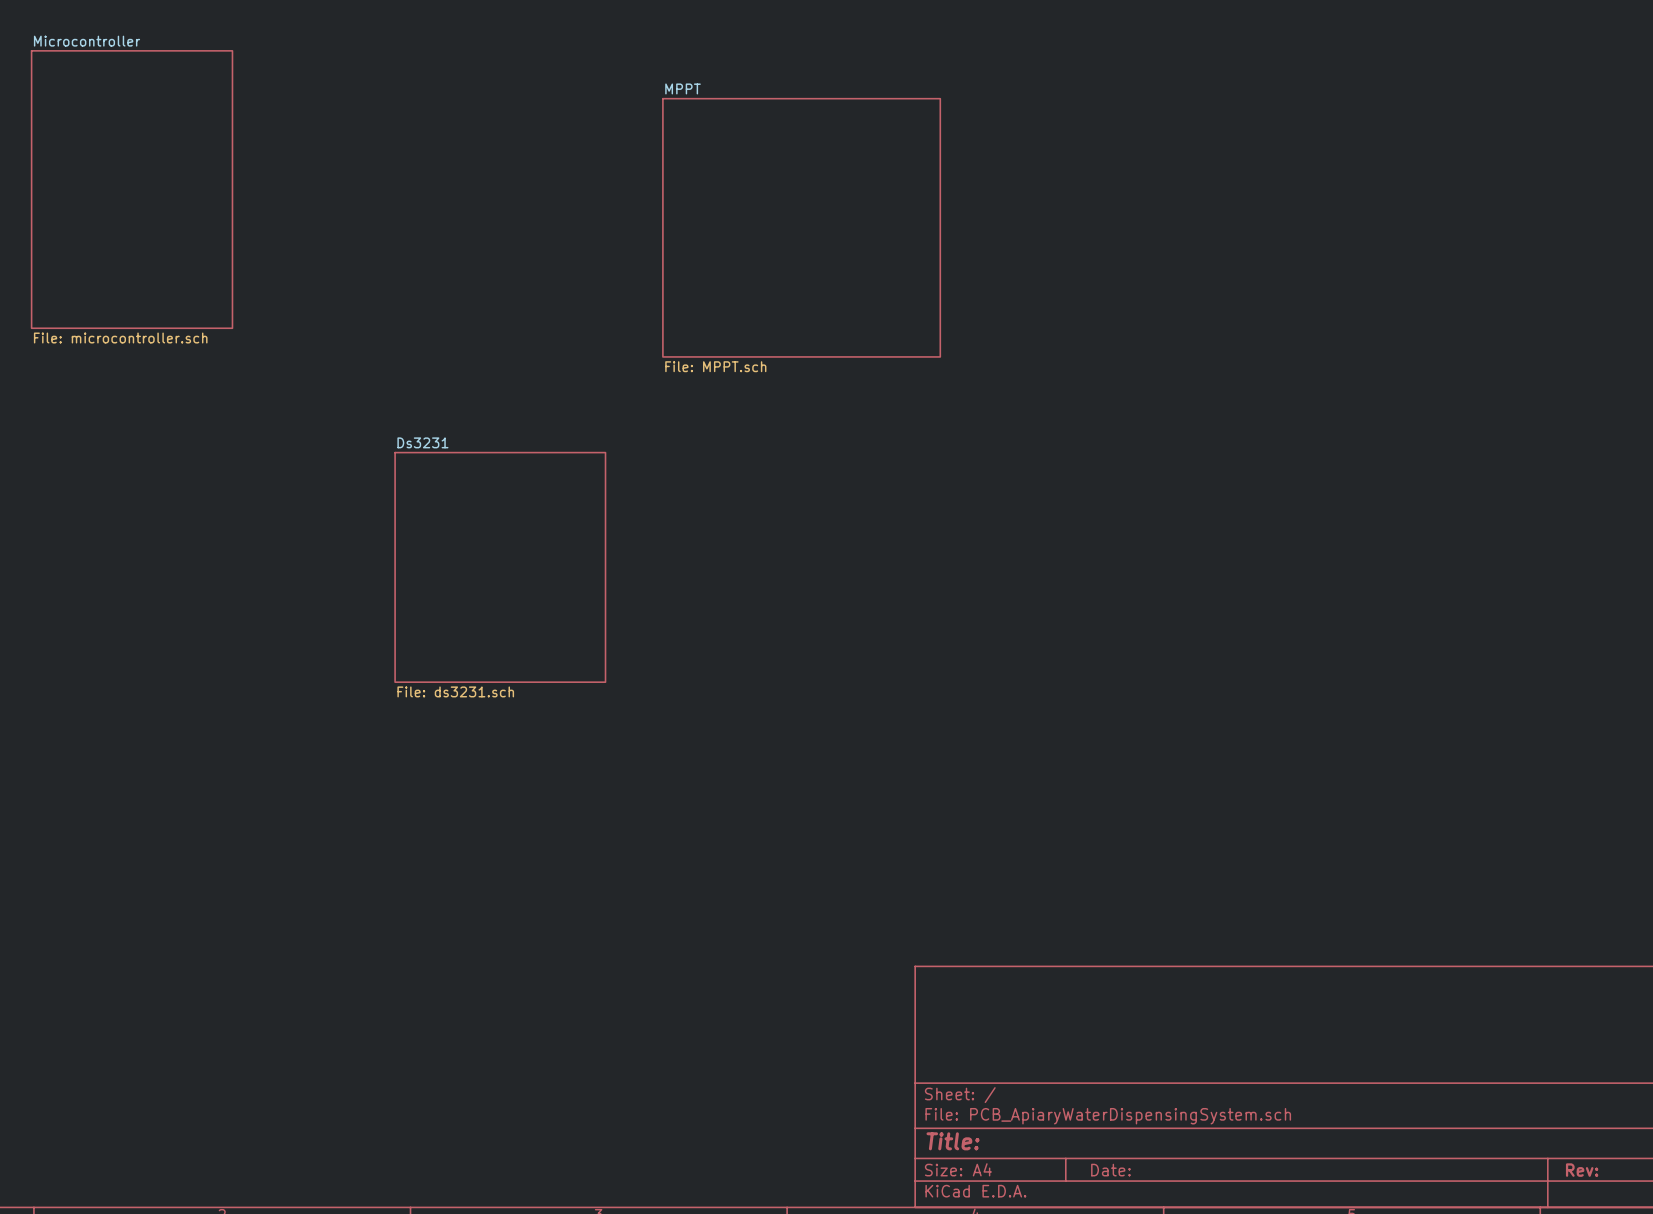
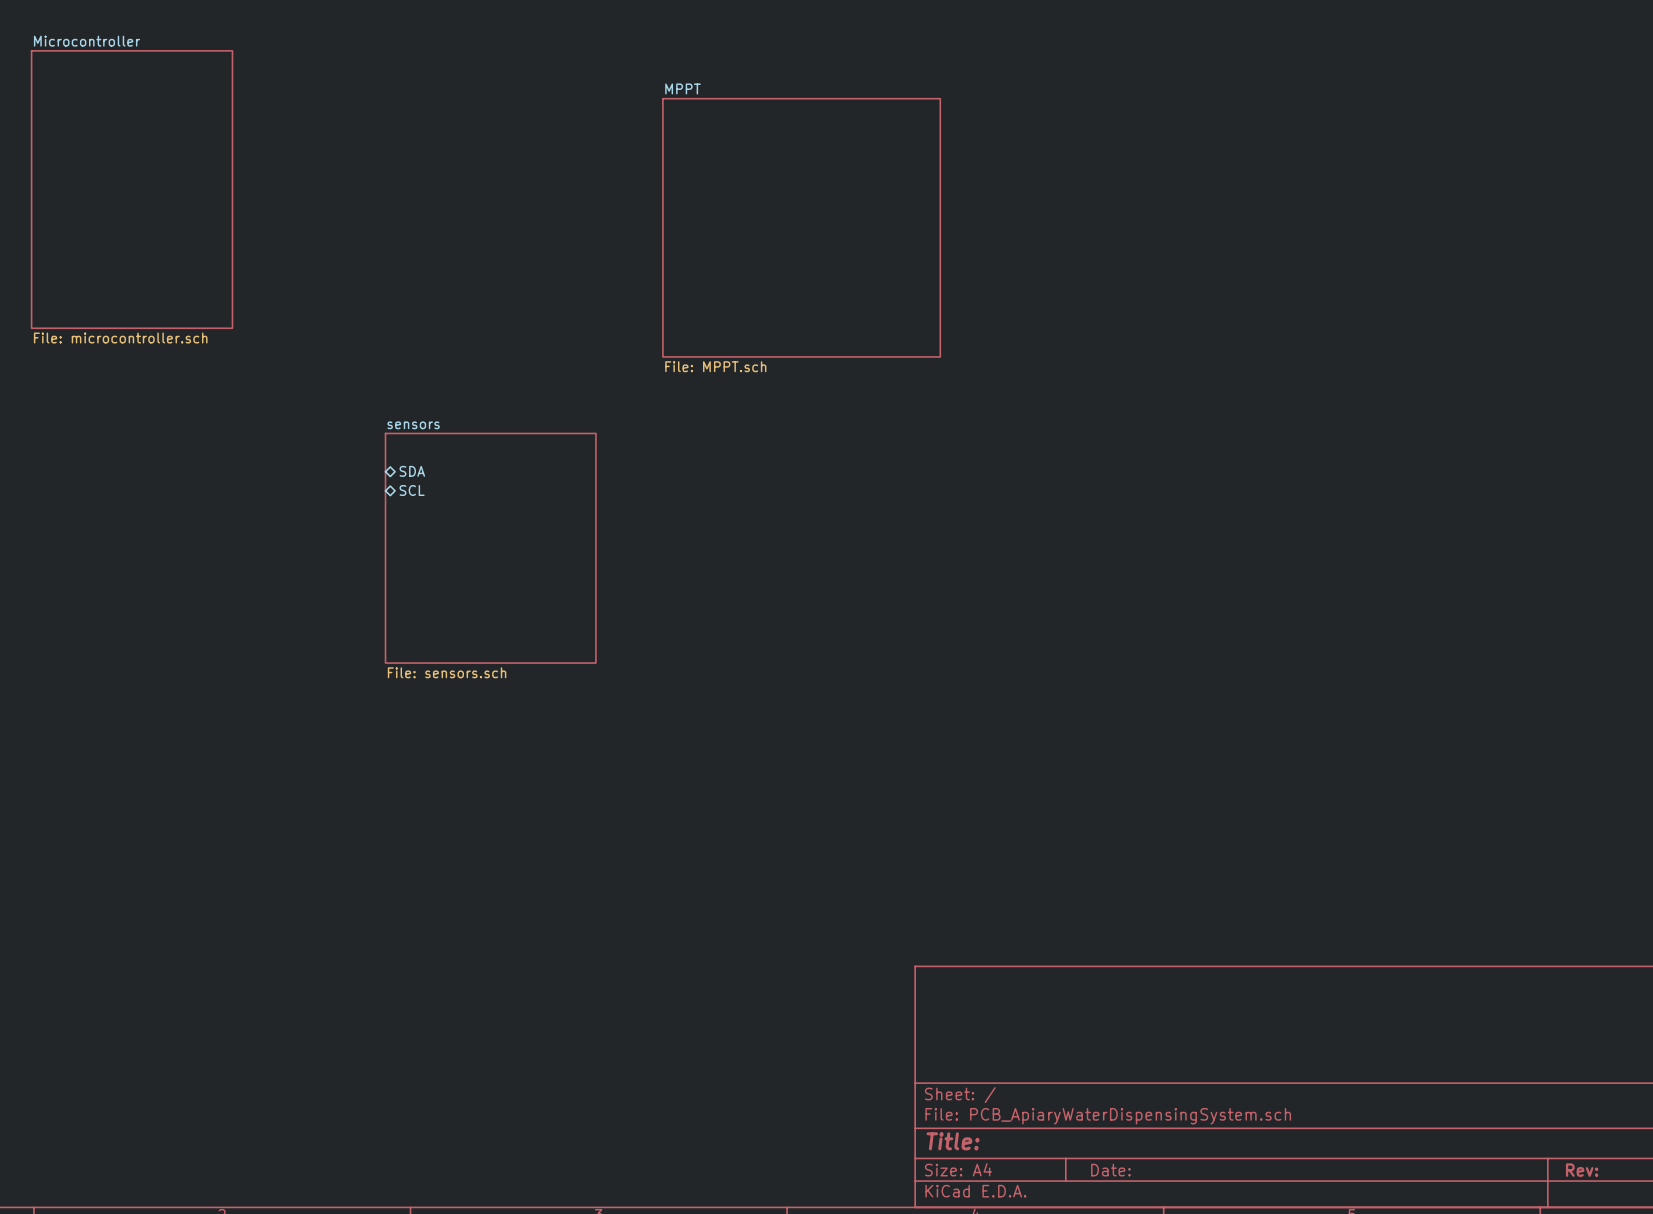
sheet pin: none -> SDA (412, 471)
sheet pin: none -> SCL (412, 490)
sheet sensors: none -> File: sensors.sch (490, 548)
sheet Ds3231: File: ds3231.sch (500, 567) -> none

